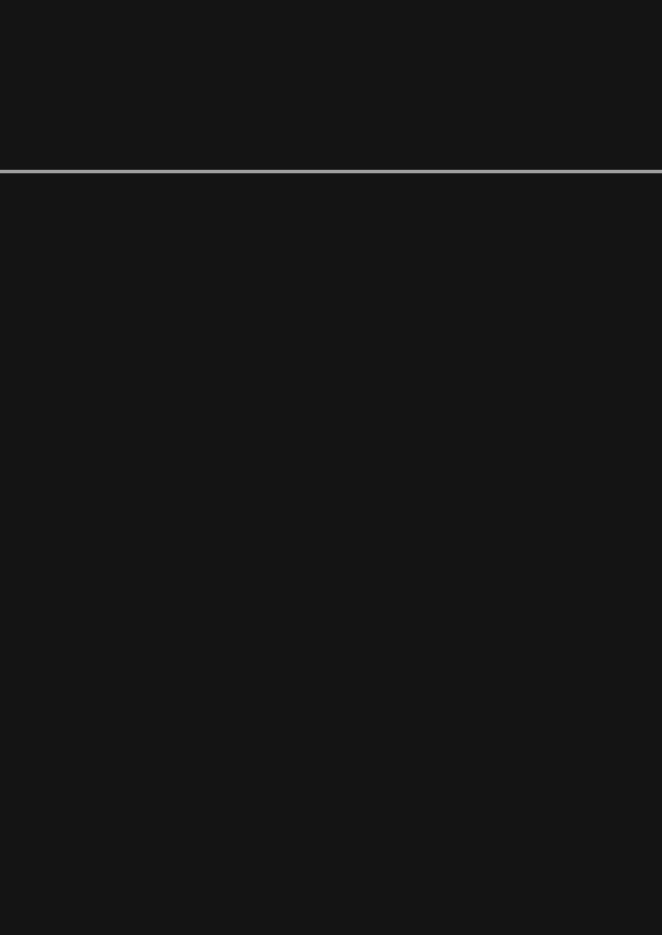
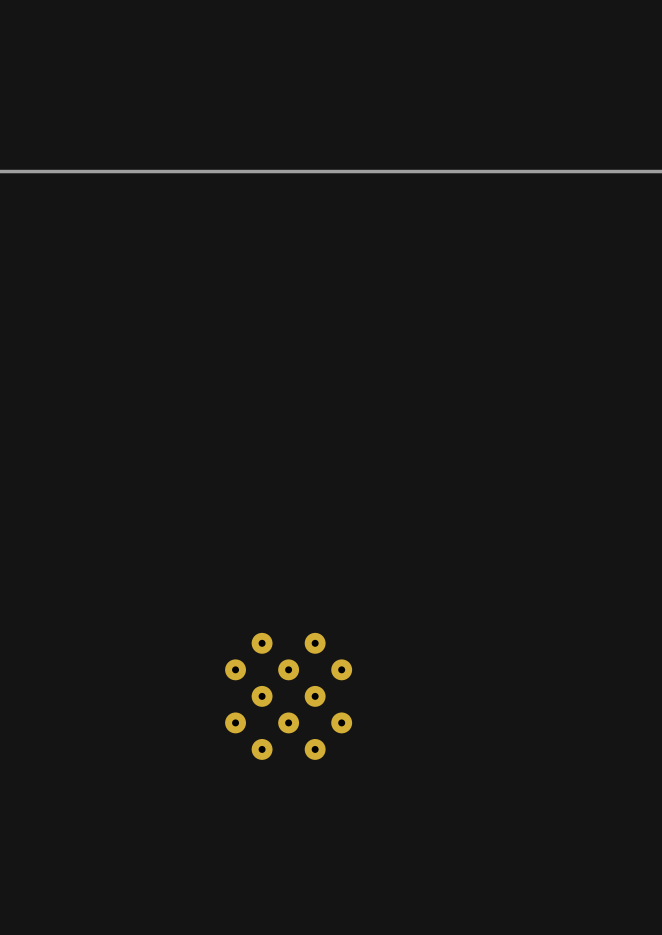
part: none -> (288, 696)

